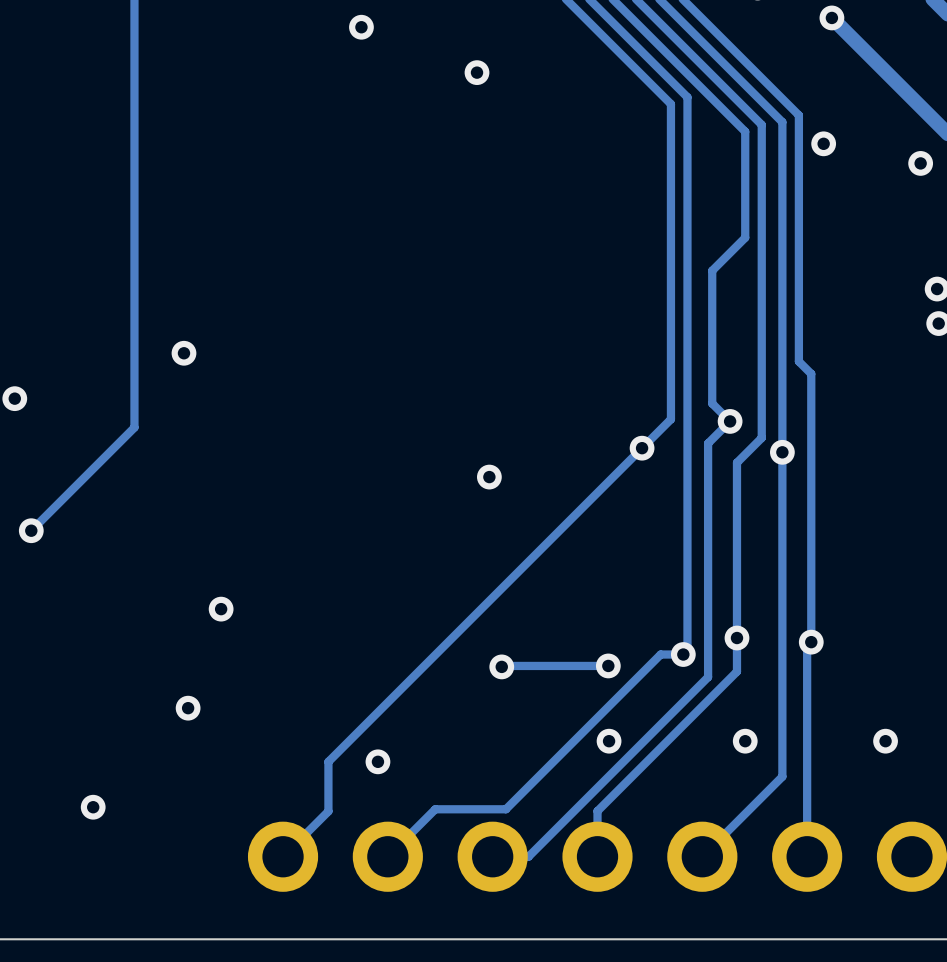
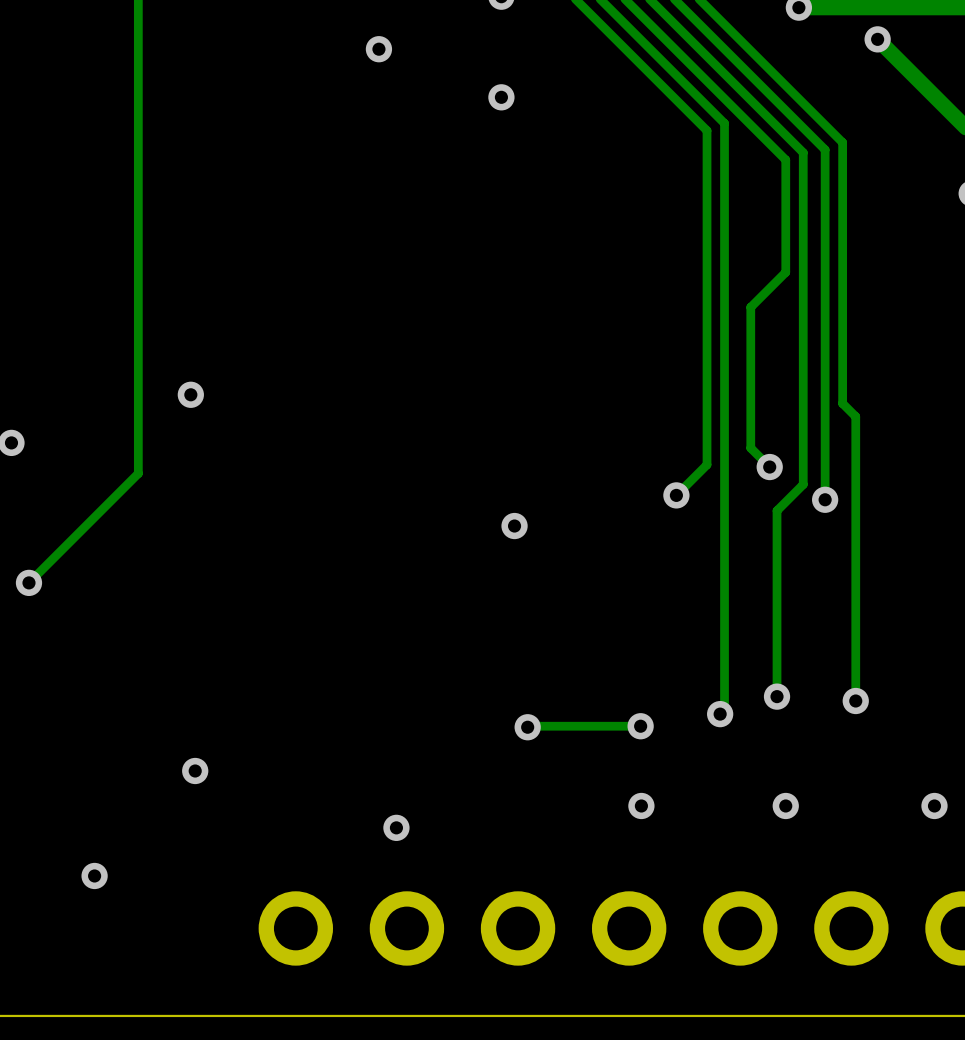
via: (823, 143) -> none
track: (730, 421) (708, 443) (708, 677) (528, 856) (492, 856) -> none
track: (642, 448) (328, 761) (328, 811) (283, 856) -> none
track: (782, 452) (782, 776) (702, 856) -> none
via: (221, 609) -> none
track: (736, 638) (736, 671) (597, 811) (597, 856) -> none
track: (811, 642) (807, 646) (807, 856) -> none
track: (683, 654) (660, 654) (505, 809) (435, 809) (387, 856) -> none

